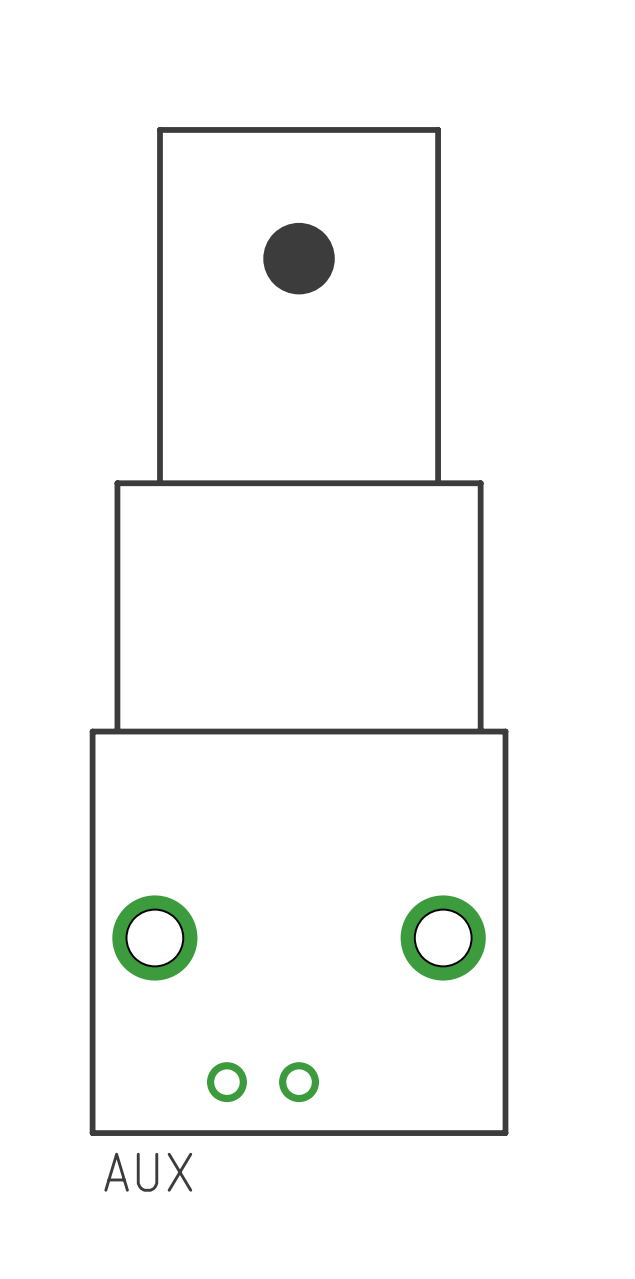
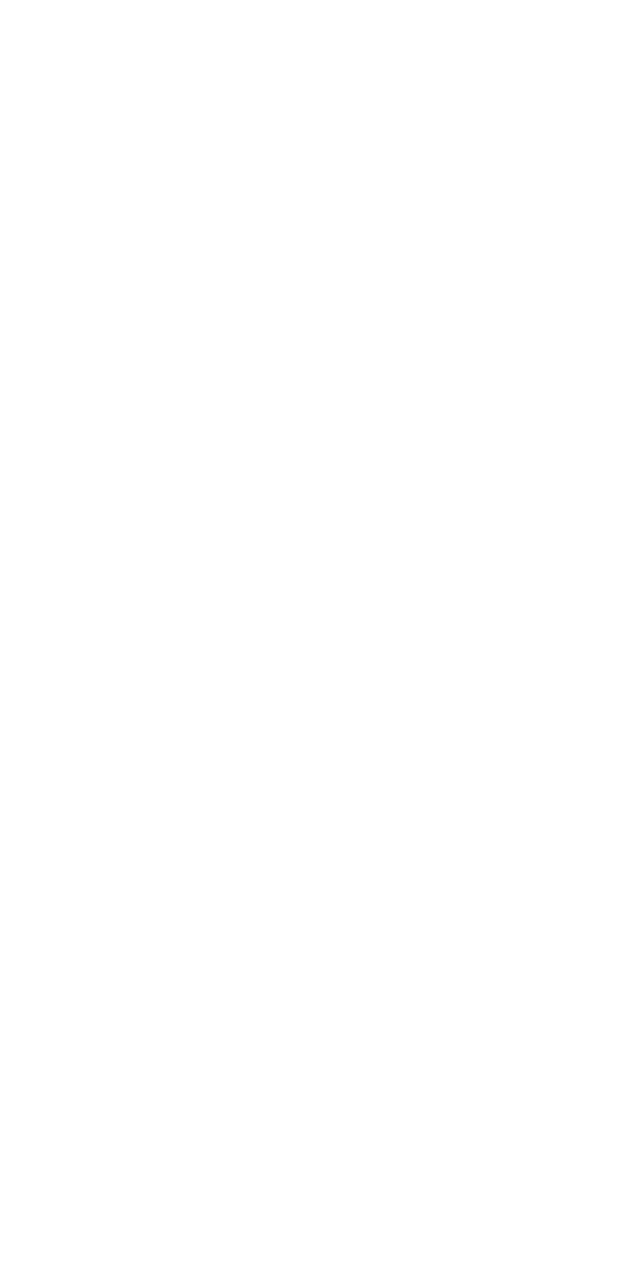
AUX: (299, 631) -> none

